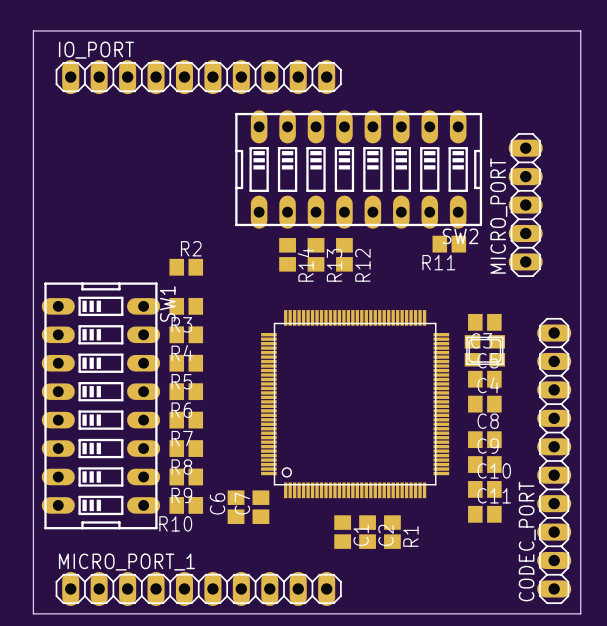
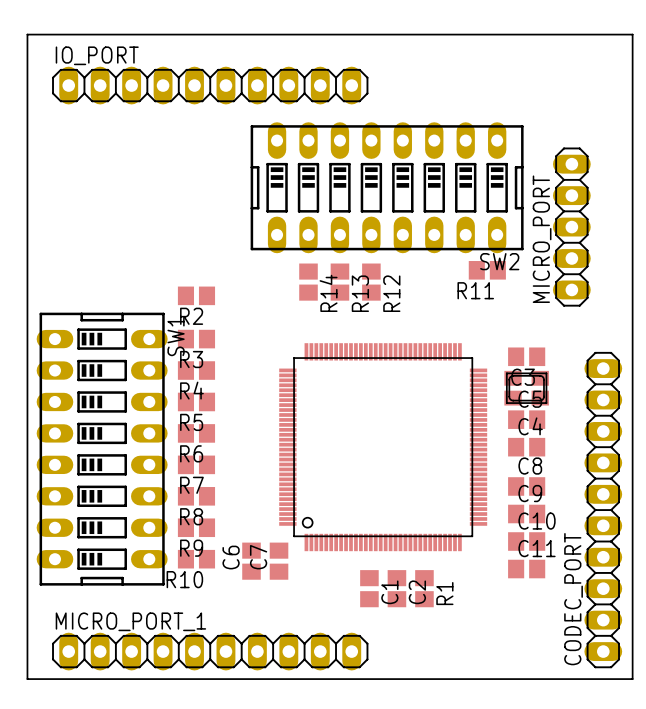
R2 name position: R2 (191, 248) -> R2 (191, 316)

